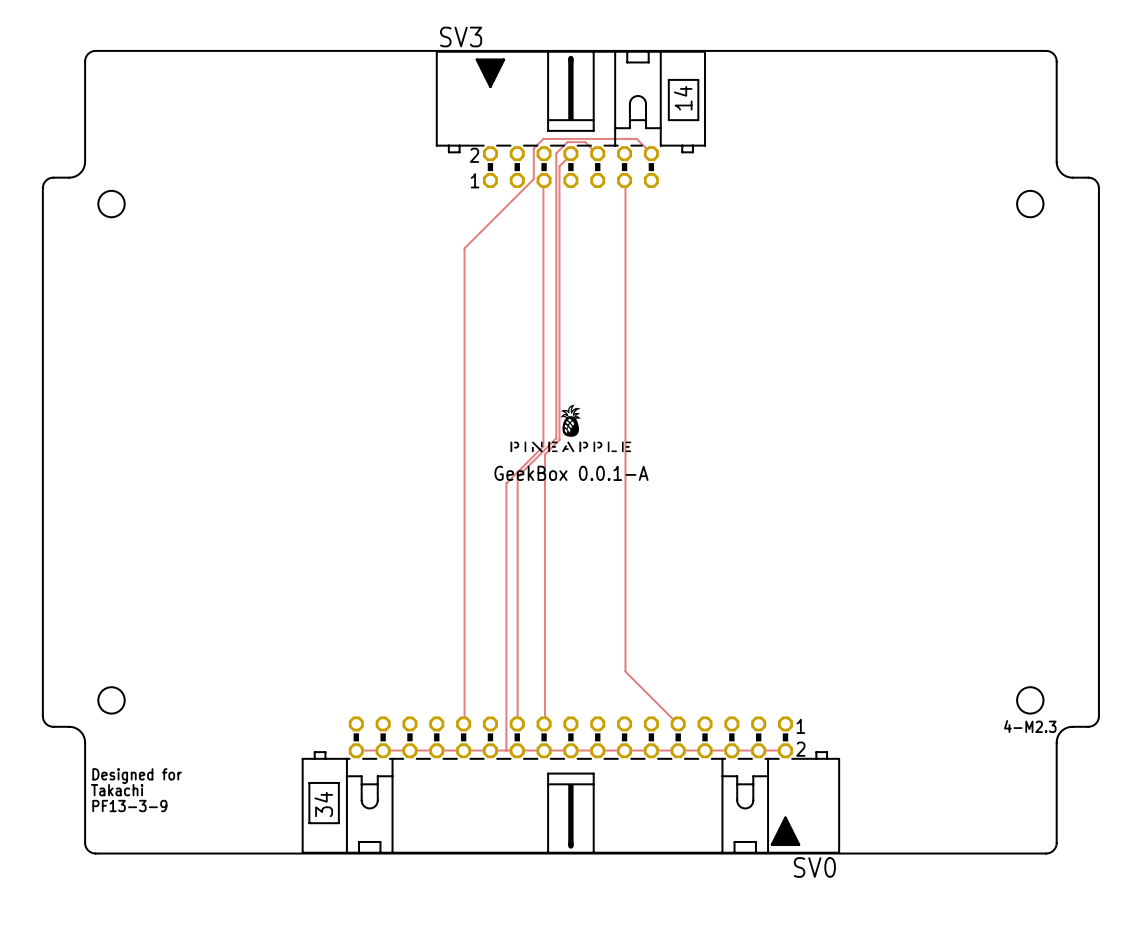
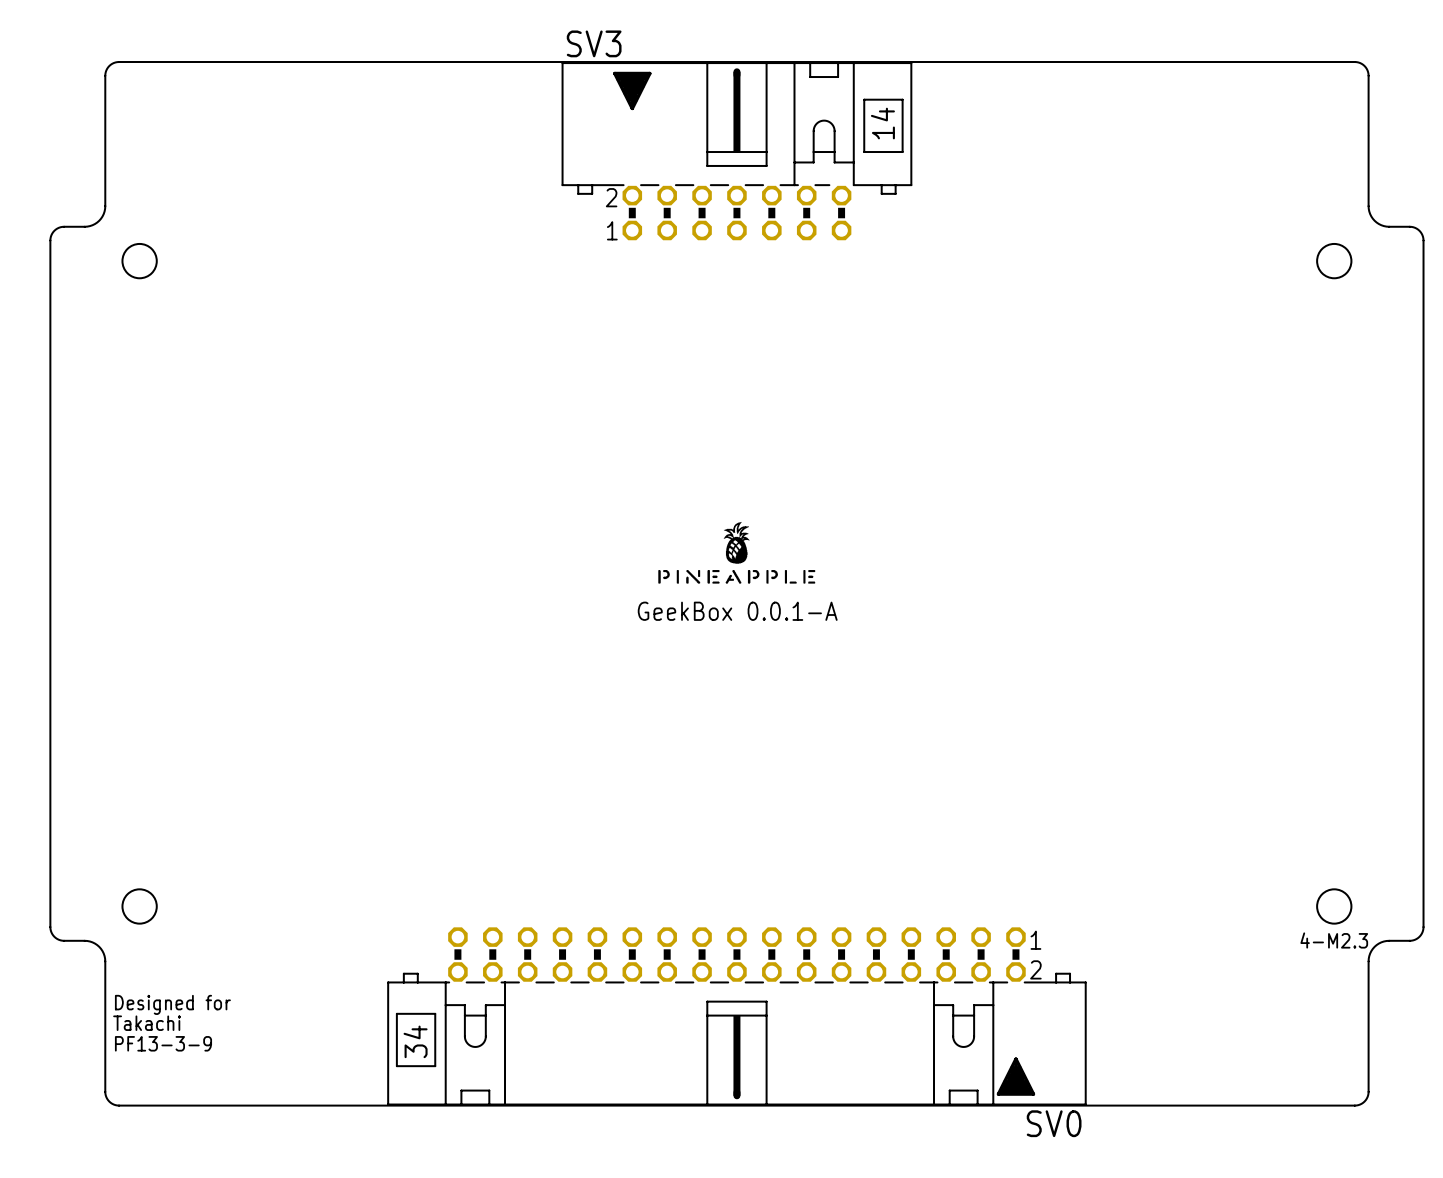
track: (570, 153) (559, 166) (559, 439) (545, 454) (544, 723) -> none
track: (597, 153) (585, 142) (567, 142) (556, 153) (556, 438) (517, 476) (517, 723) -> none
track: (651, 153) (636, 138) (543, 138) (533, 148) (533, 179) (464, 248) (463, 723) -> none
track: (544, 180) (543, 446) (506, 483) (506, 750) -> none
track: (624, 180) (625, 671) (678, 723) -> none
track: (356, 750) (785, 750) -> none

